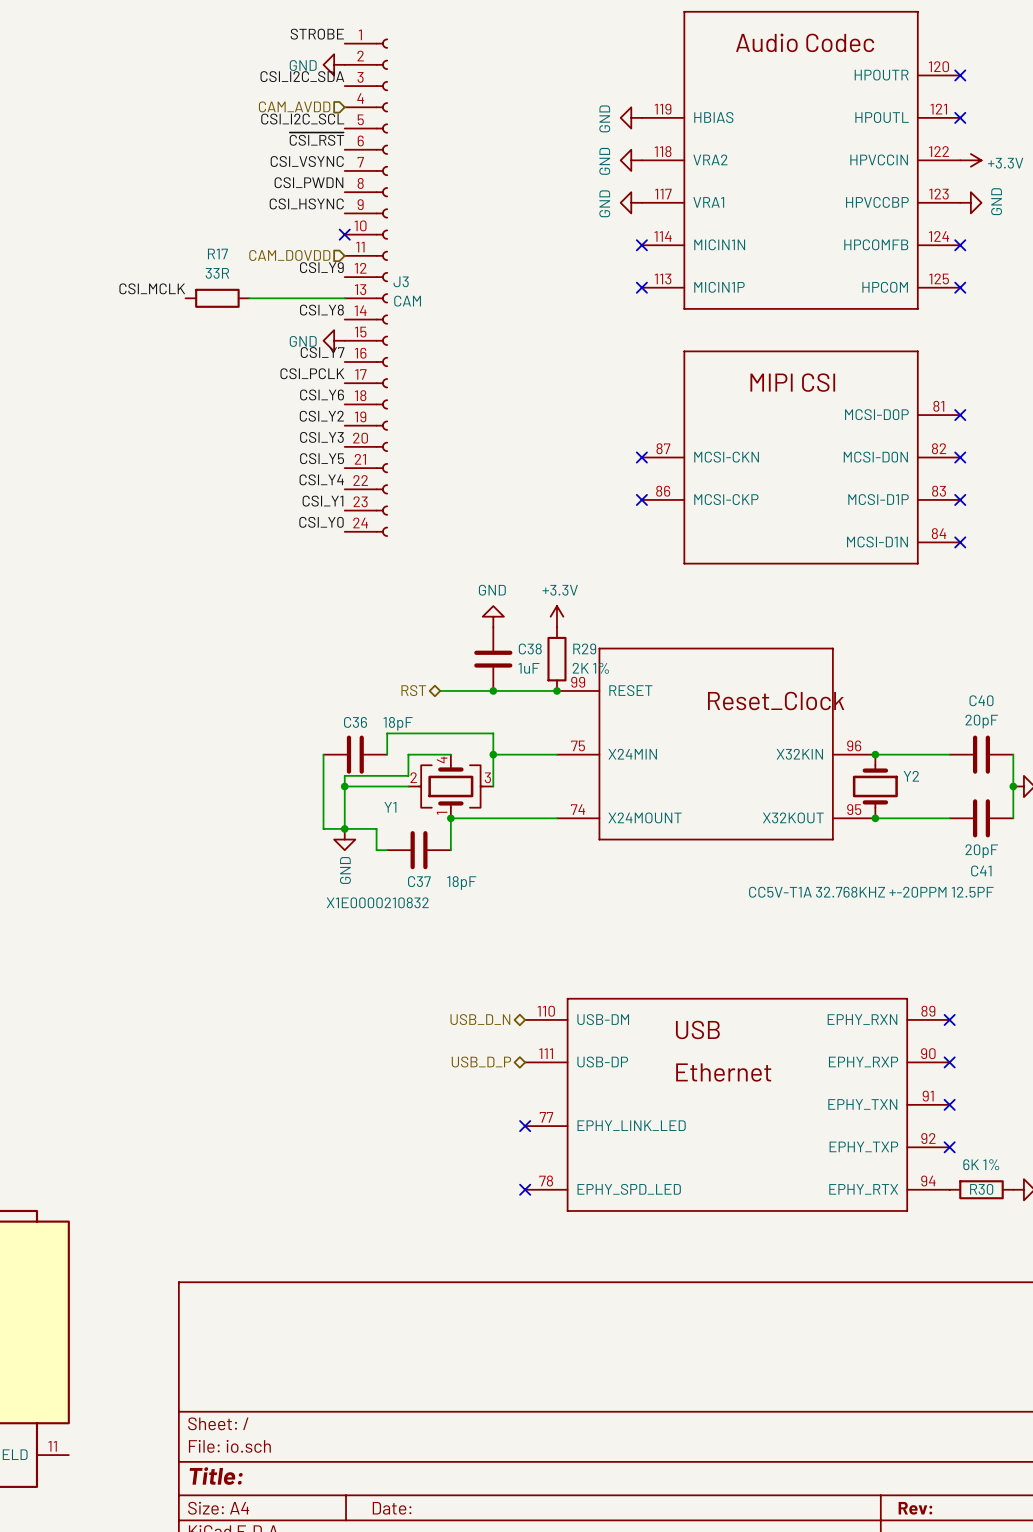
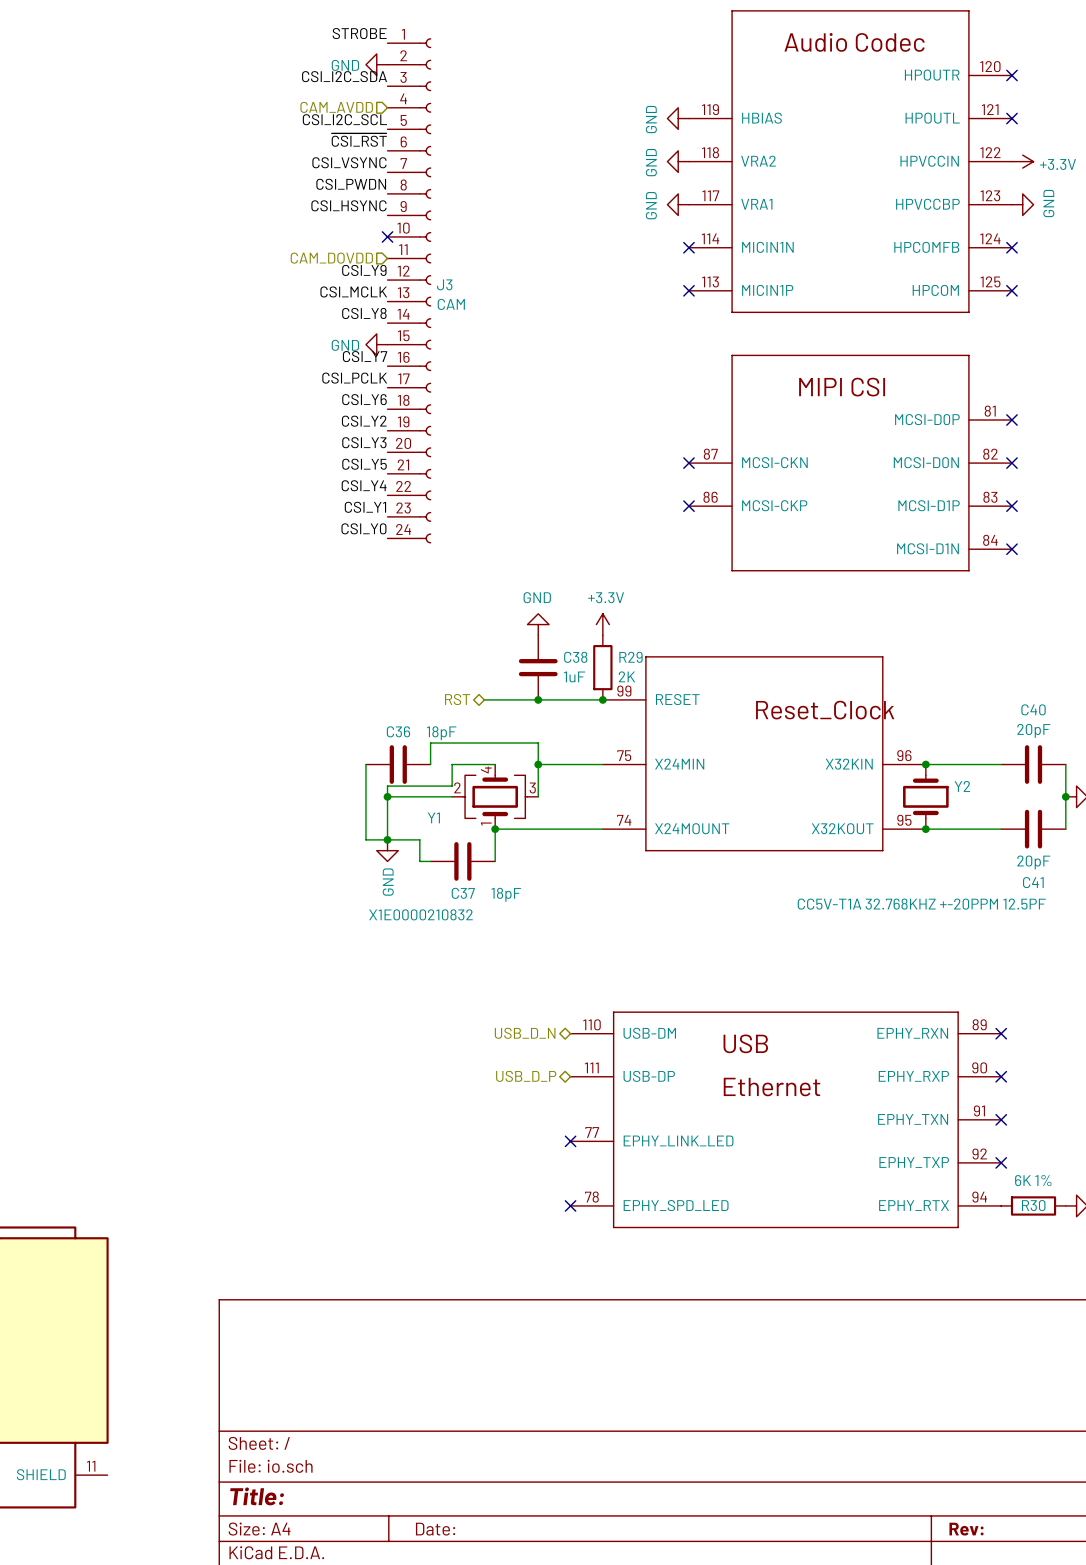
label position: CSI_MCLK (152, 288) -> CSI_MCLK (353, 291)
R17: 33R (217, 298) -> none
wire: (249, 298) (344, 298) -> none
R29 value: 2K 1% (590, 668) -> 2K (626, 676)

